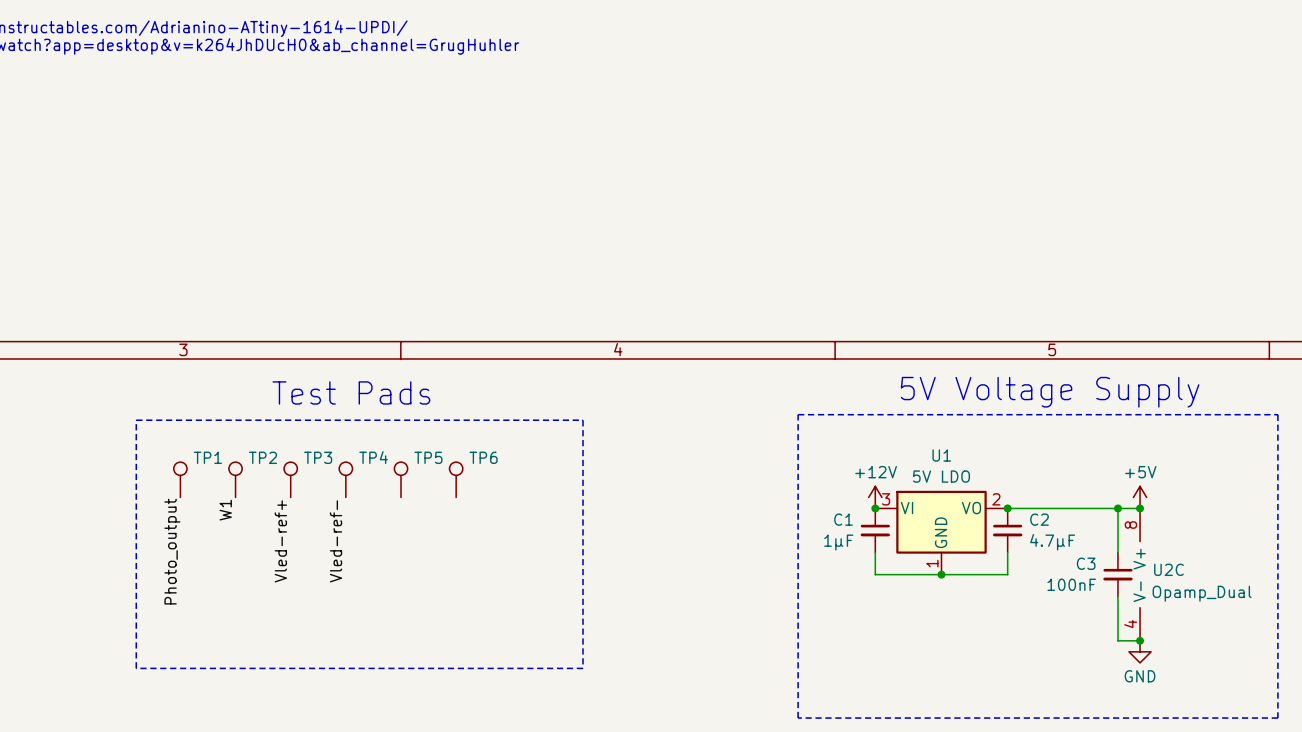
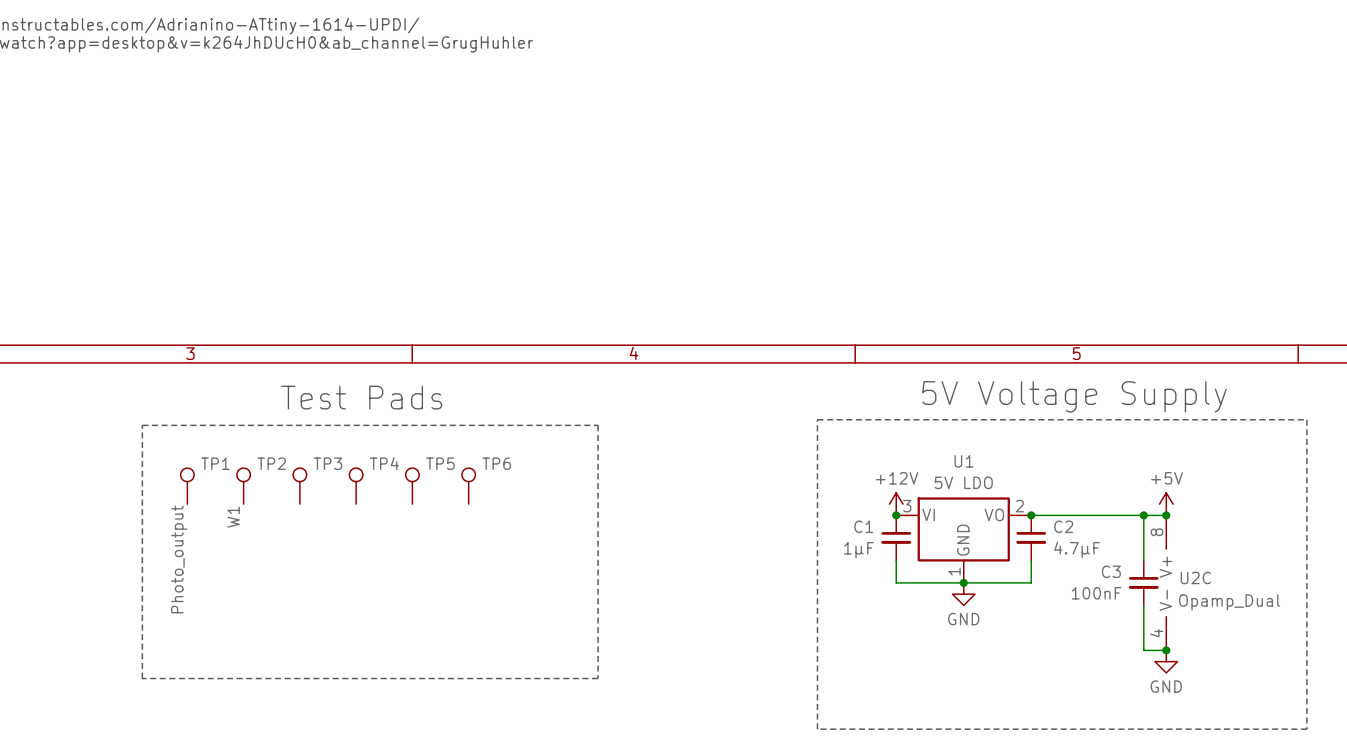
label: Vled-ref+ (280, 541) -> none
label: Vled-ref- (336, 541) -> none
power symbol: none -> GND (963, 594)

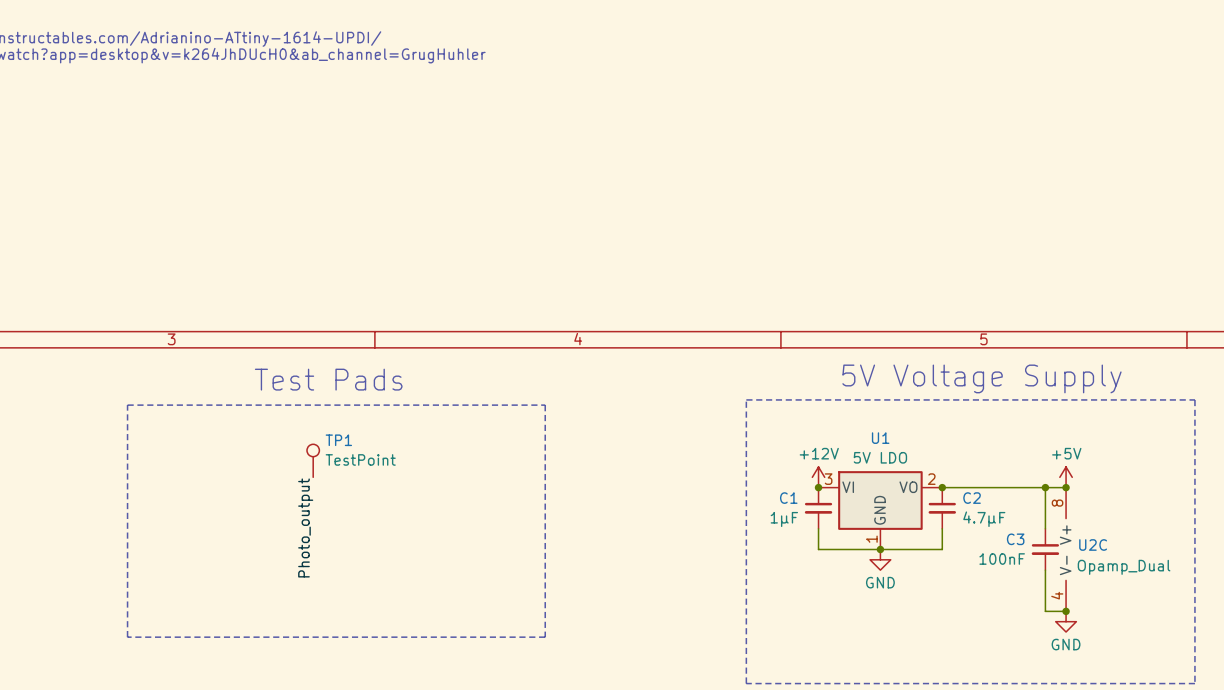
TP1 value: none -> TestPoint (360, 459)
TP1 position: (187, 486) -> (313, 460)
TP2: (243, 486) -> none
TP3: (299, 486) -> none
TP4: (356, 486) -> none
TP5: (412, 486) -> none
TP6: (468, 486) -> none
label: W1 (233, 517) -> none
label position: Photo_output (179, 559) -> Photo_output (305, 527)

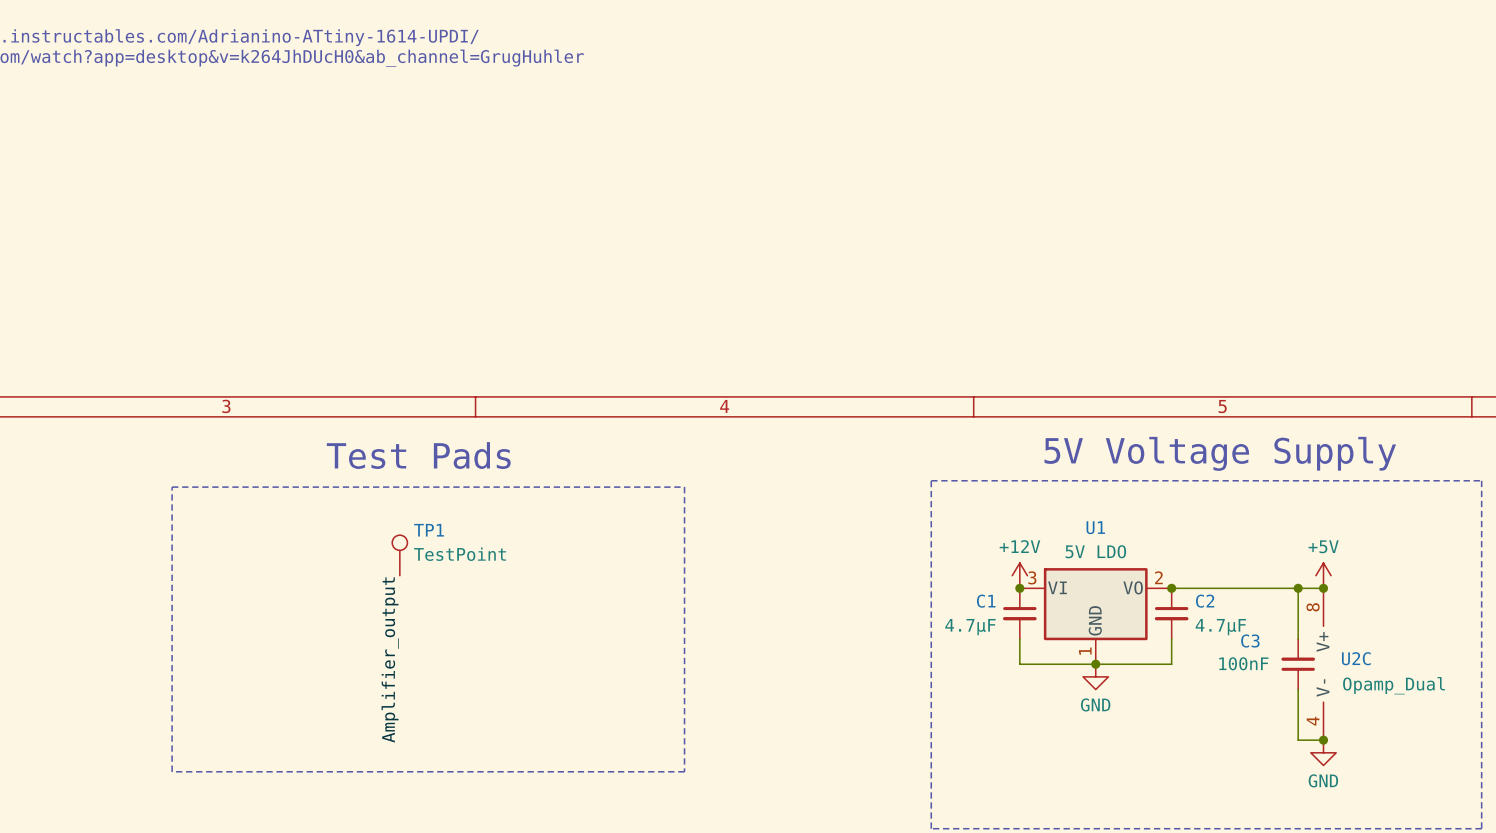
C1 value: 1µF (784, 519) -> 4.7µF (970, 627)
label: Photo_output (305, 527) -> Amplifier_output (390, 659)
C3 rotation: 0° (1045, 549) -> 180° (1298, 664)

